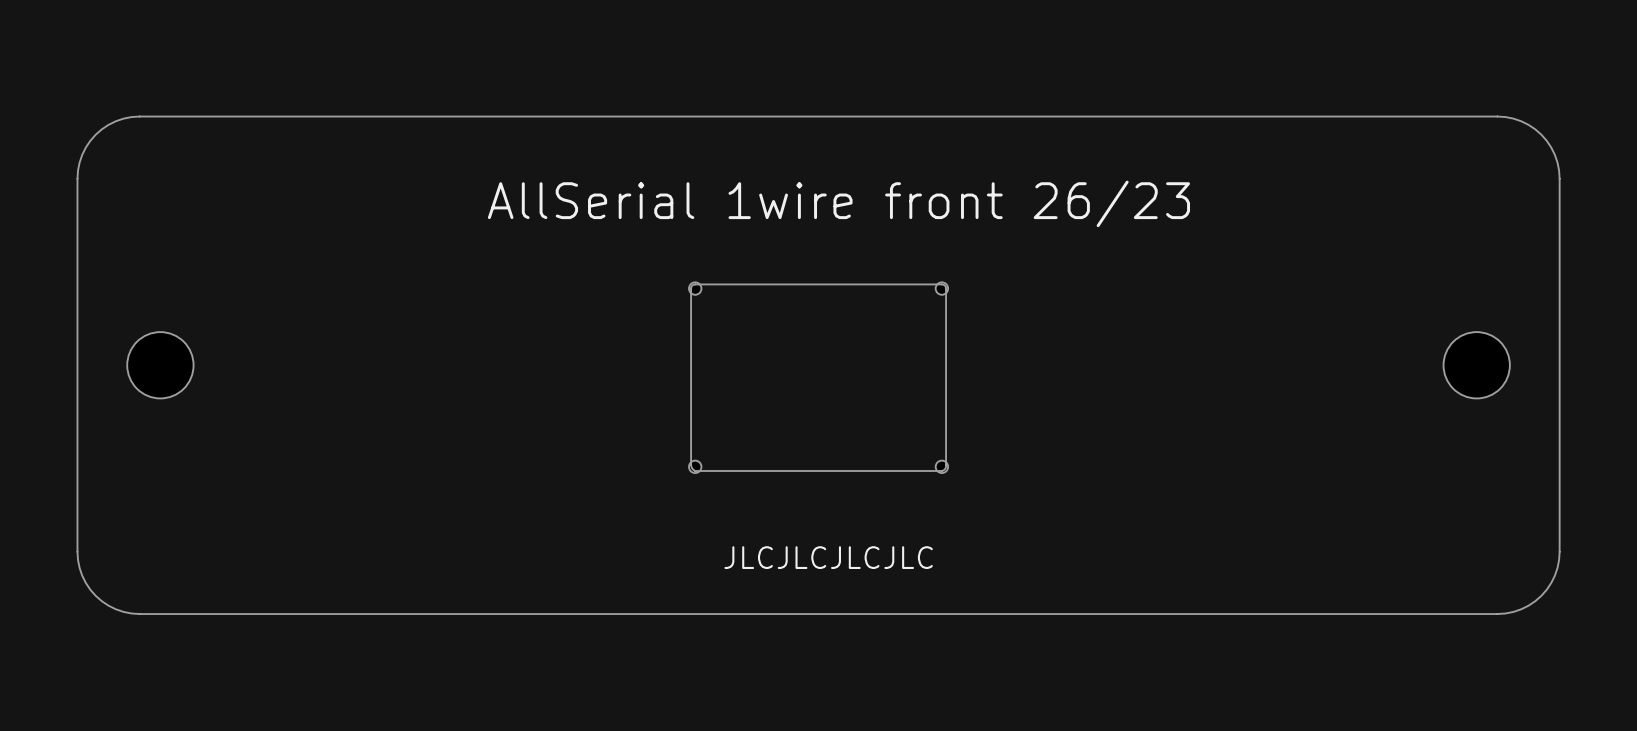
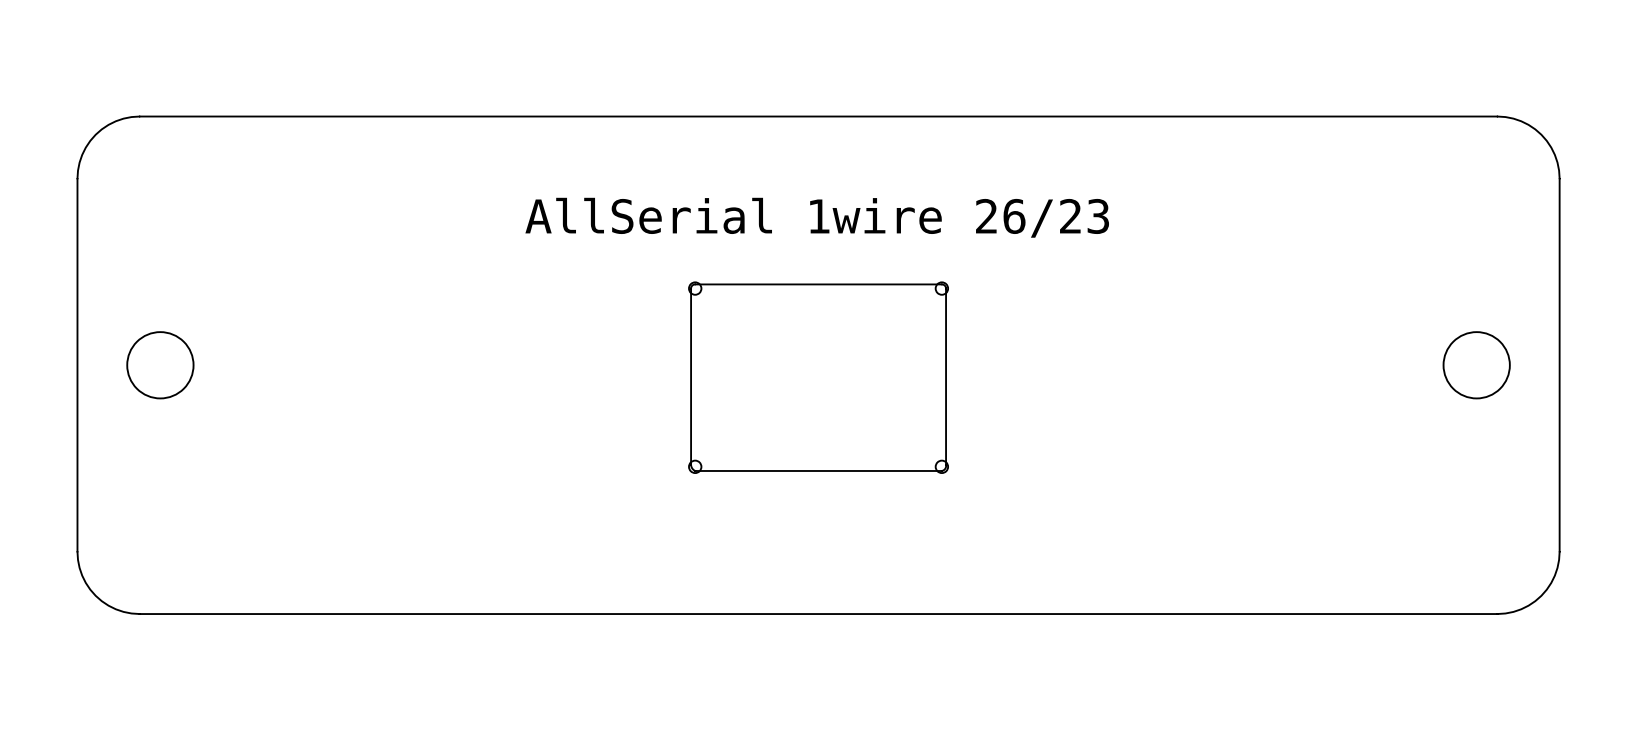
text: AllSerial 1wire front 26/23 (838, 203) -> AllSerial 1wire 26/23 (817, 217)
text: JLCJLCJLCJLC (828, 557) -> none

